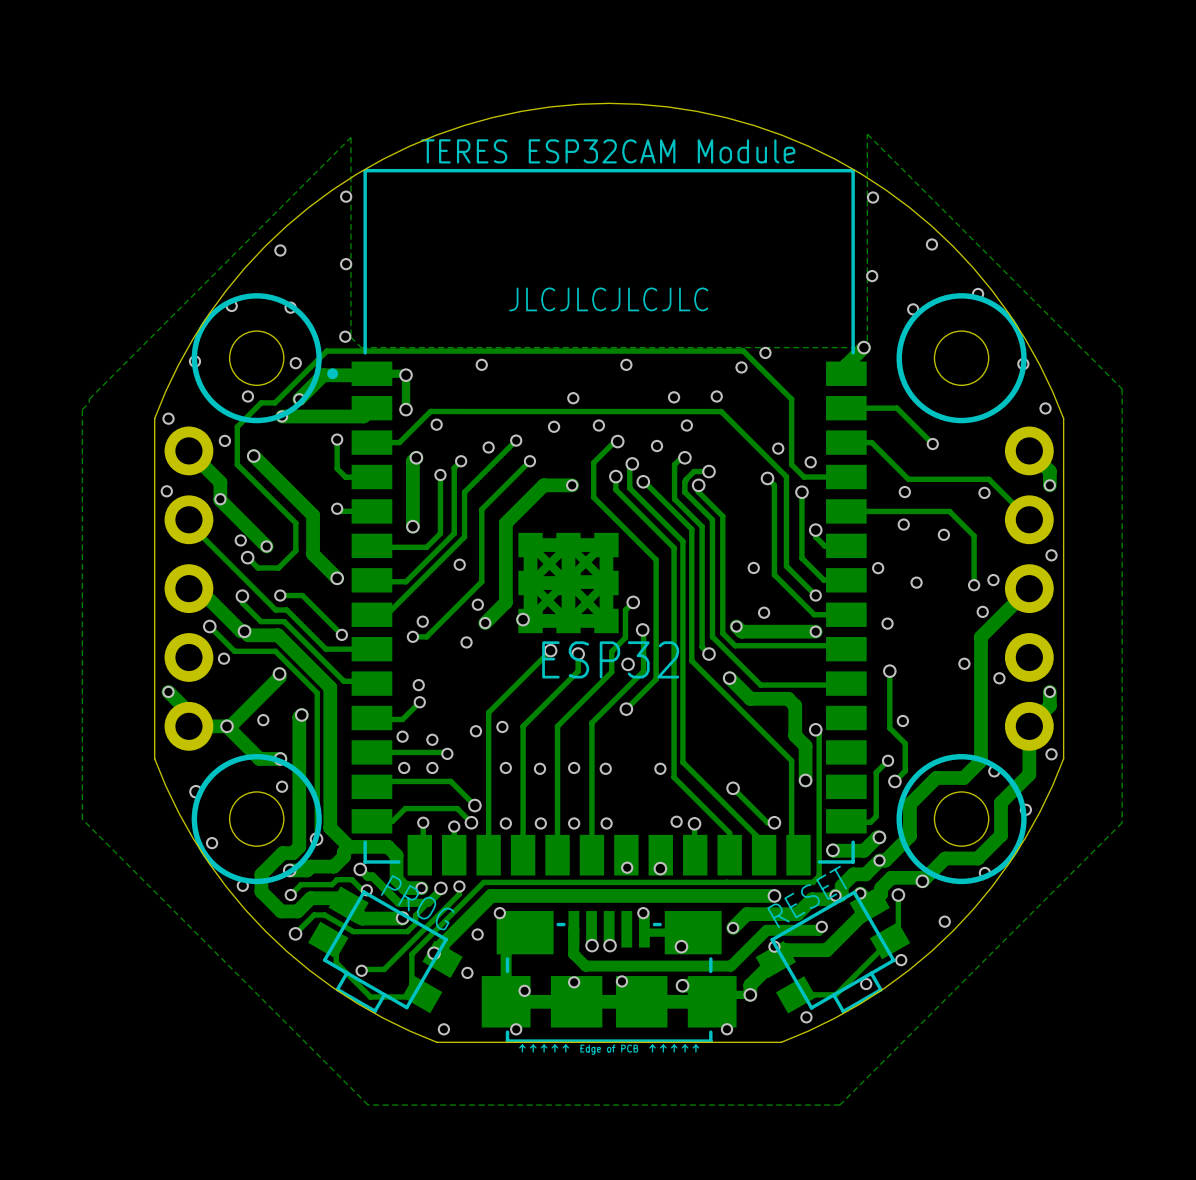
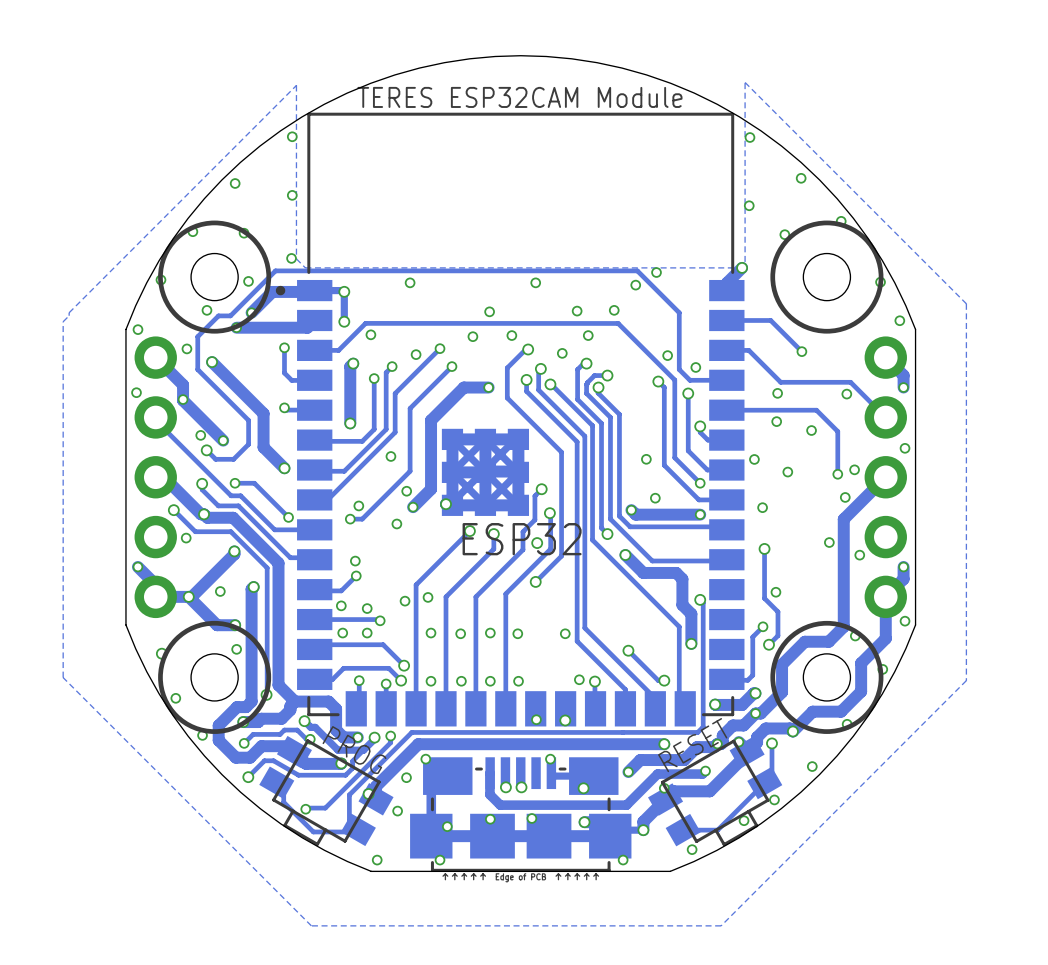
text: JLCJLCJLCJLC (608, 299) -> none

